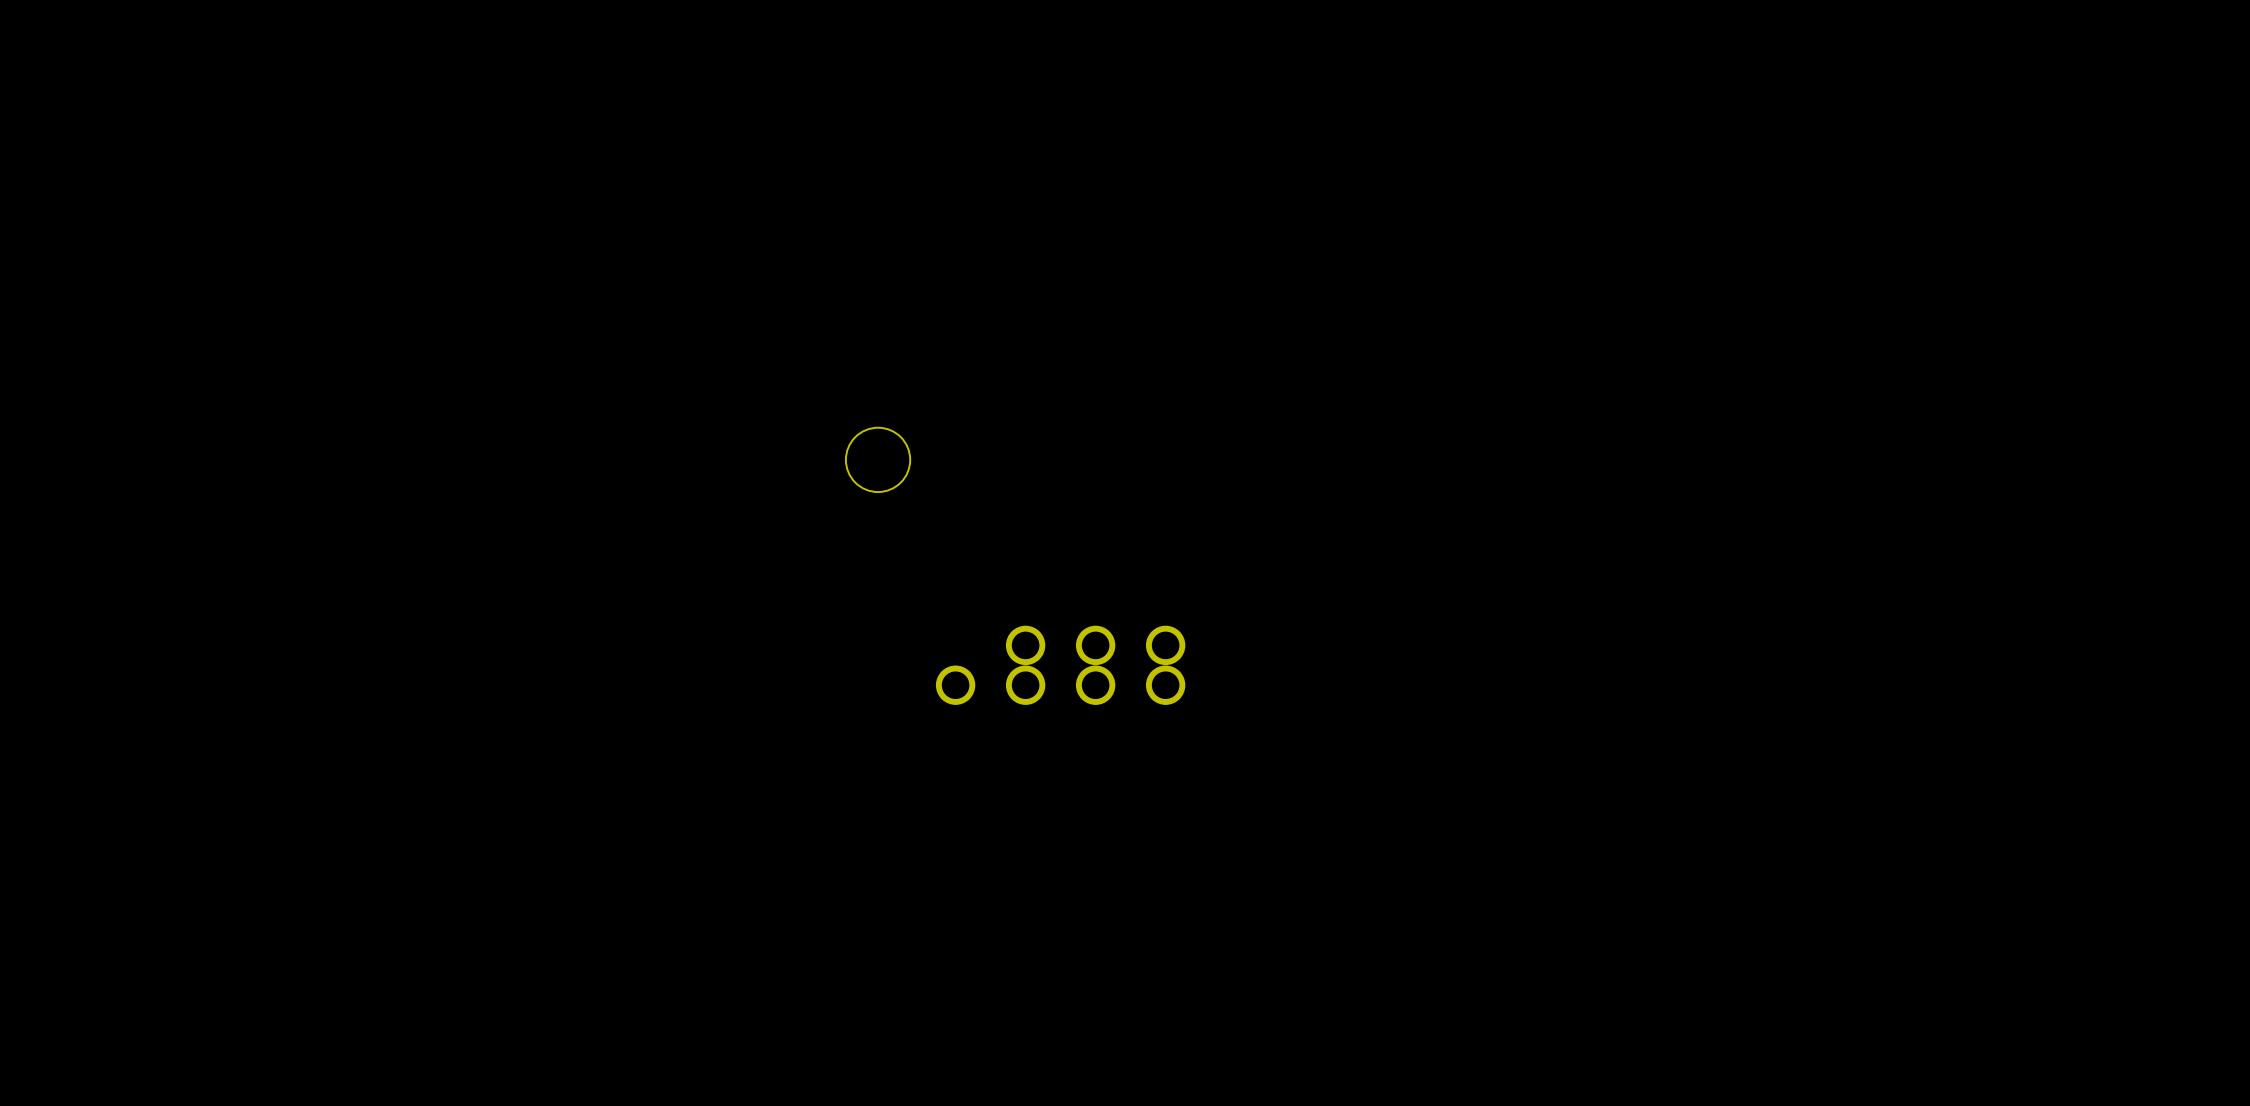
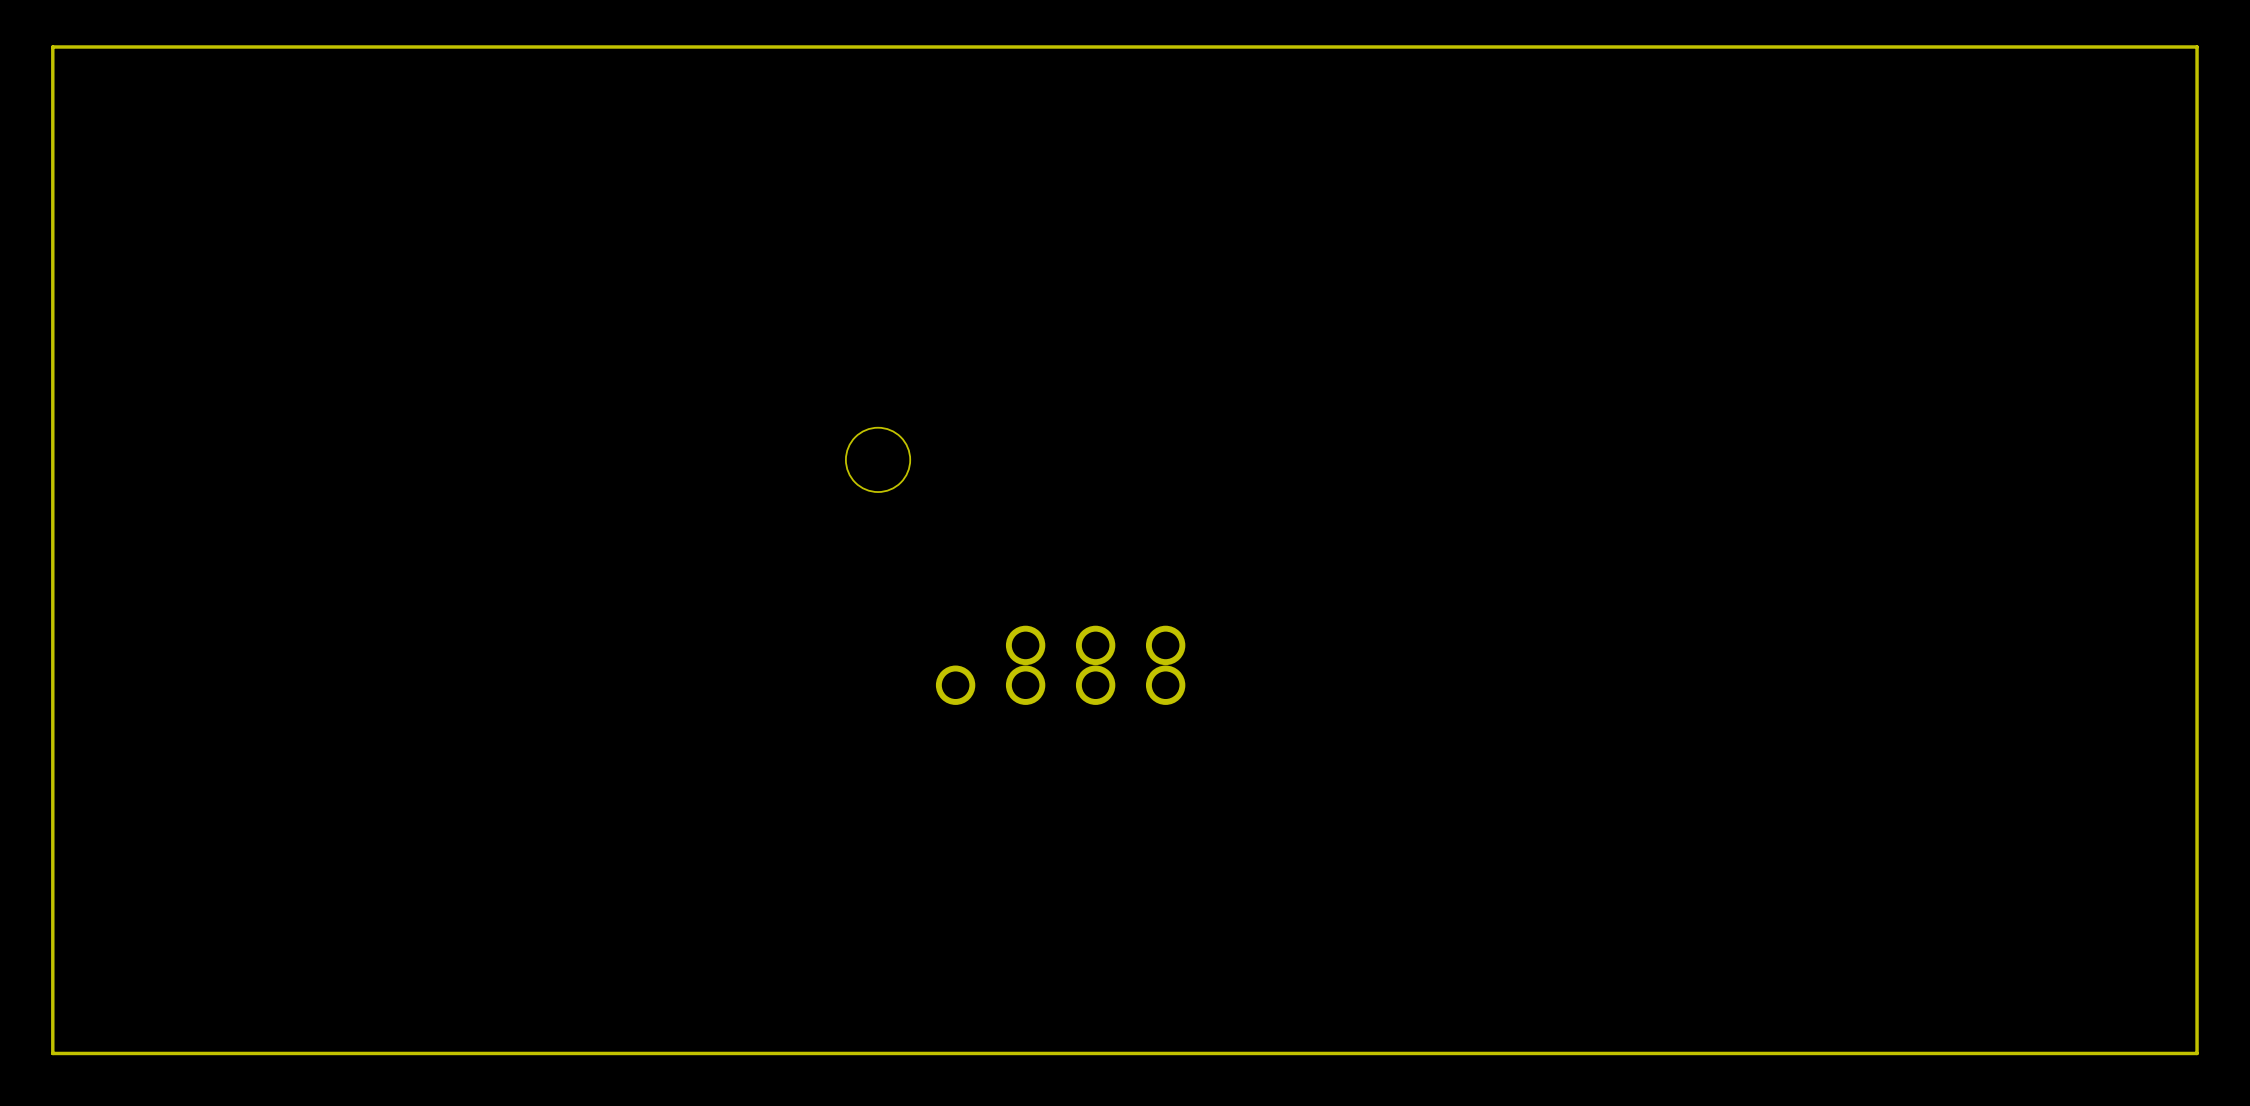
board edge: none -> (2197, 46) (52, 46) (52, 1053) (2197, 1053) (2197, 46)

